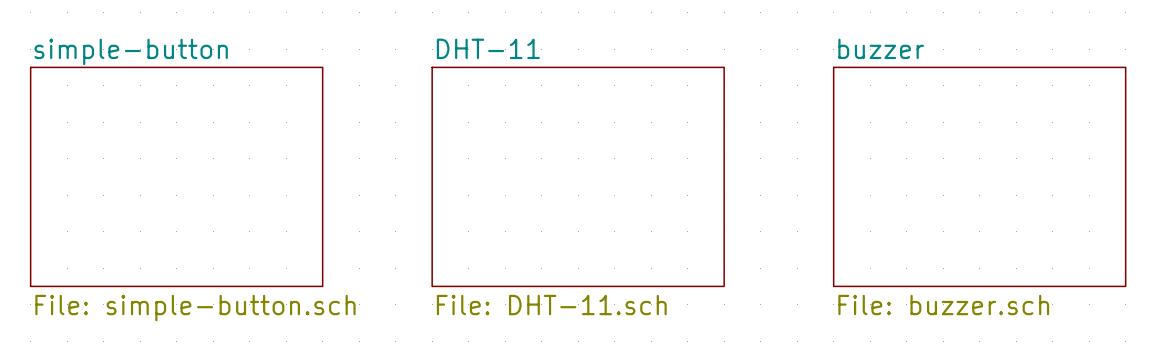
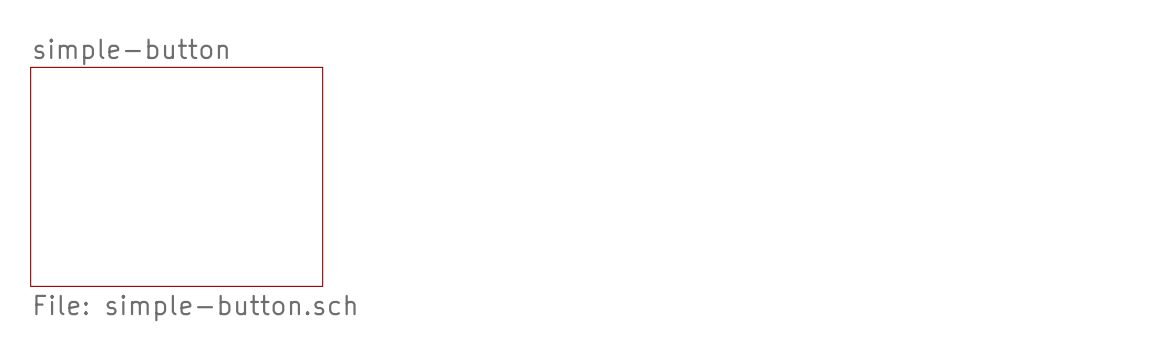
sheet DHT-11: File: DHT-11.sch (578, 176) -> none
sheet buzzer: File: buzzer.sch (979, 176) -> none

